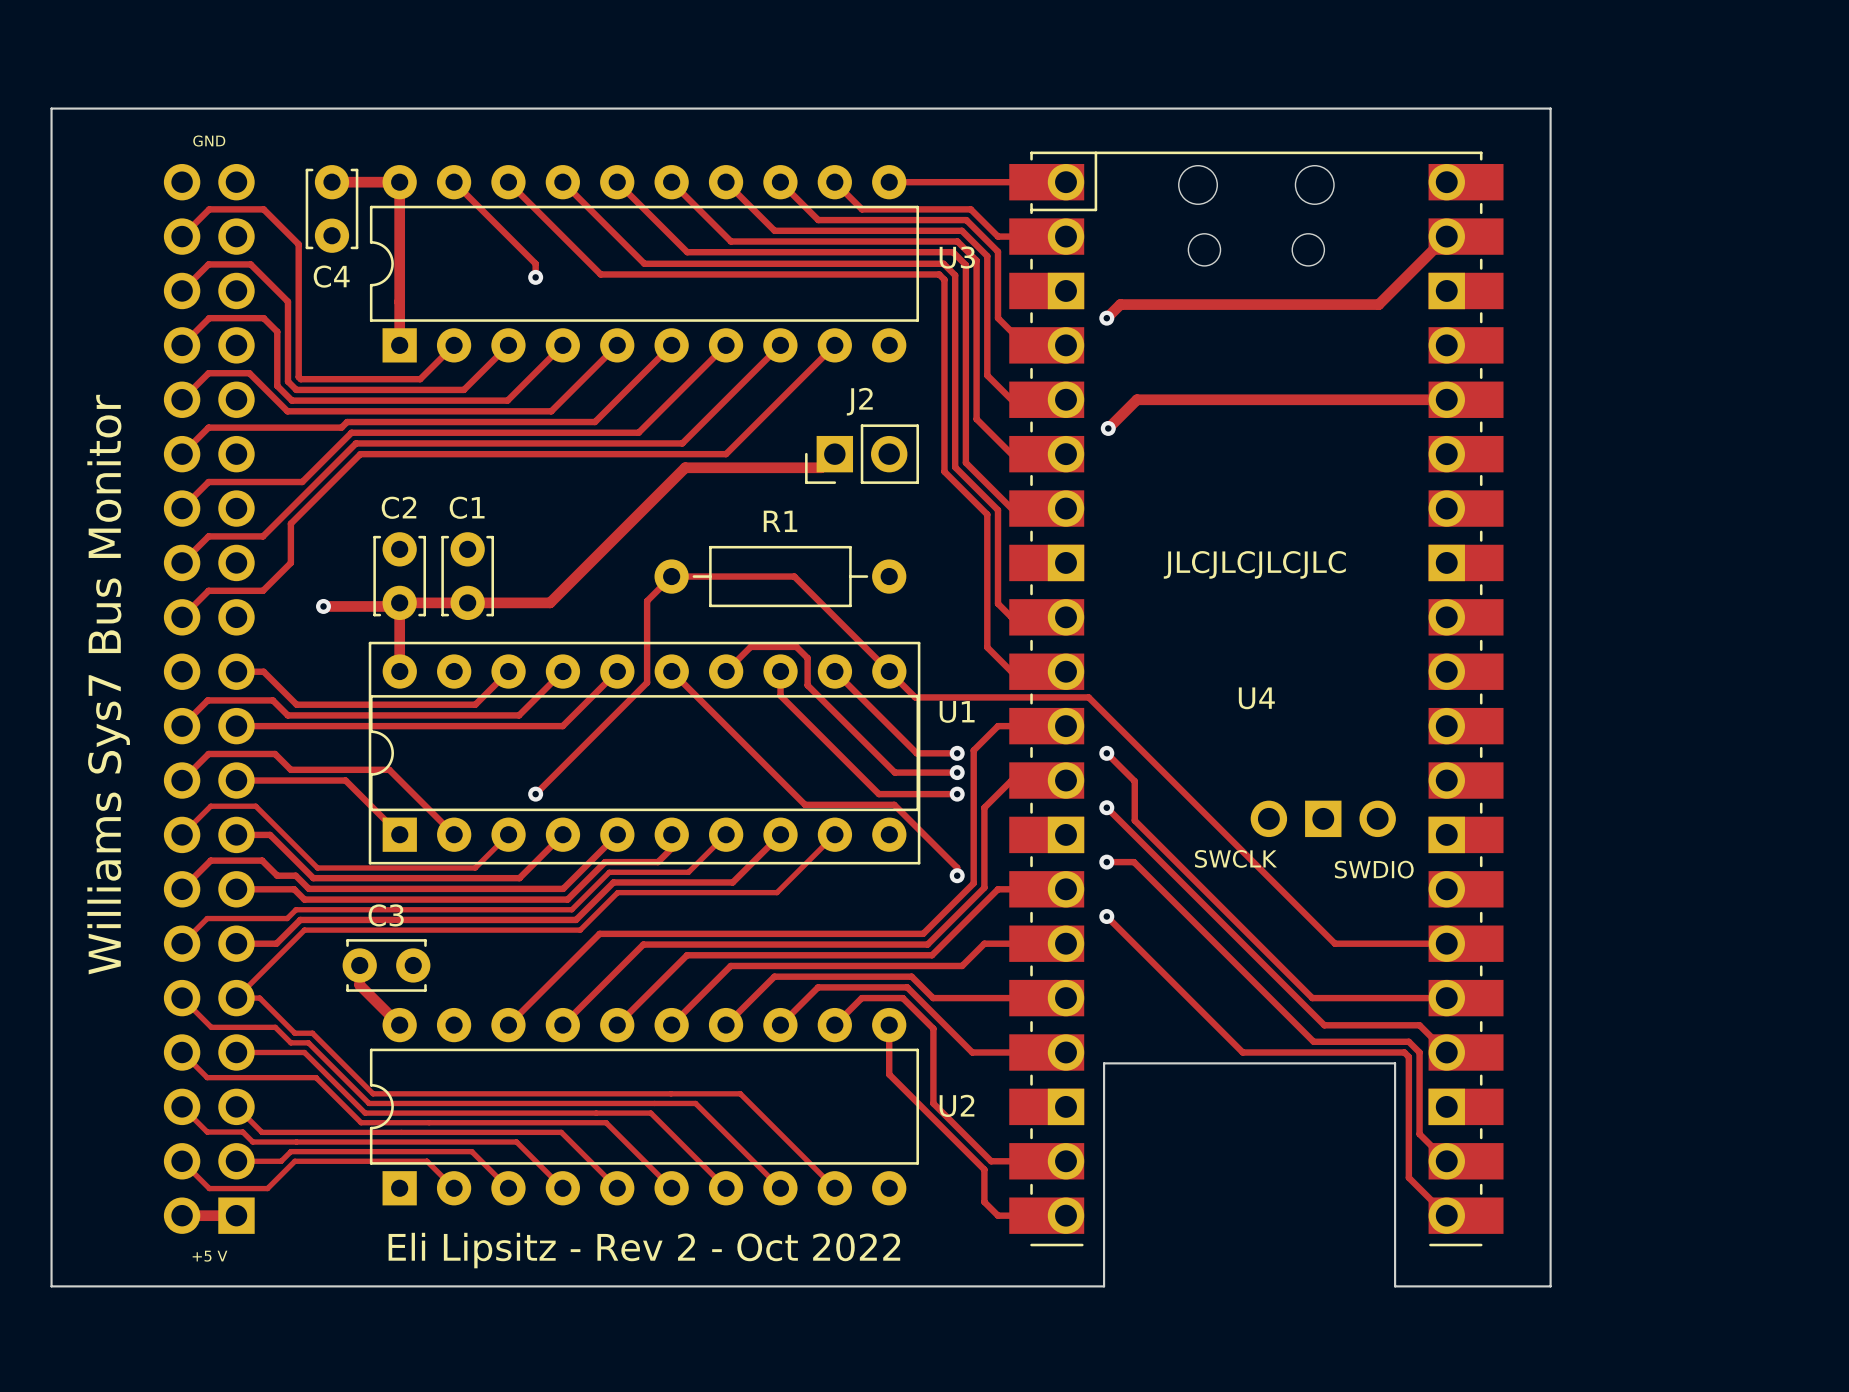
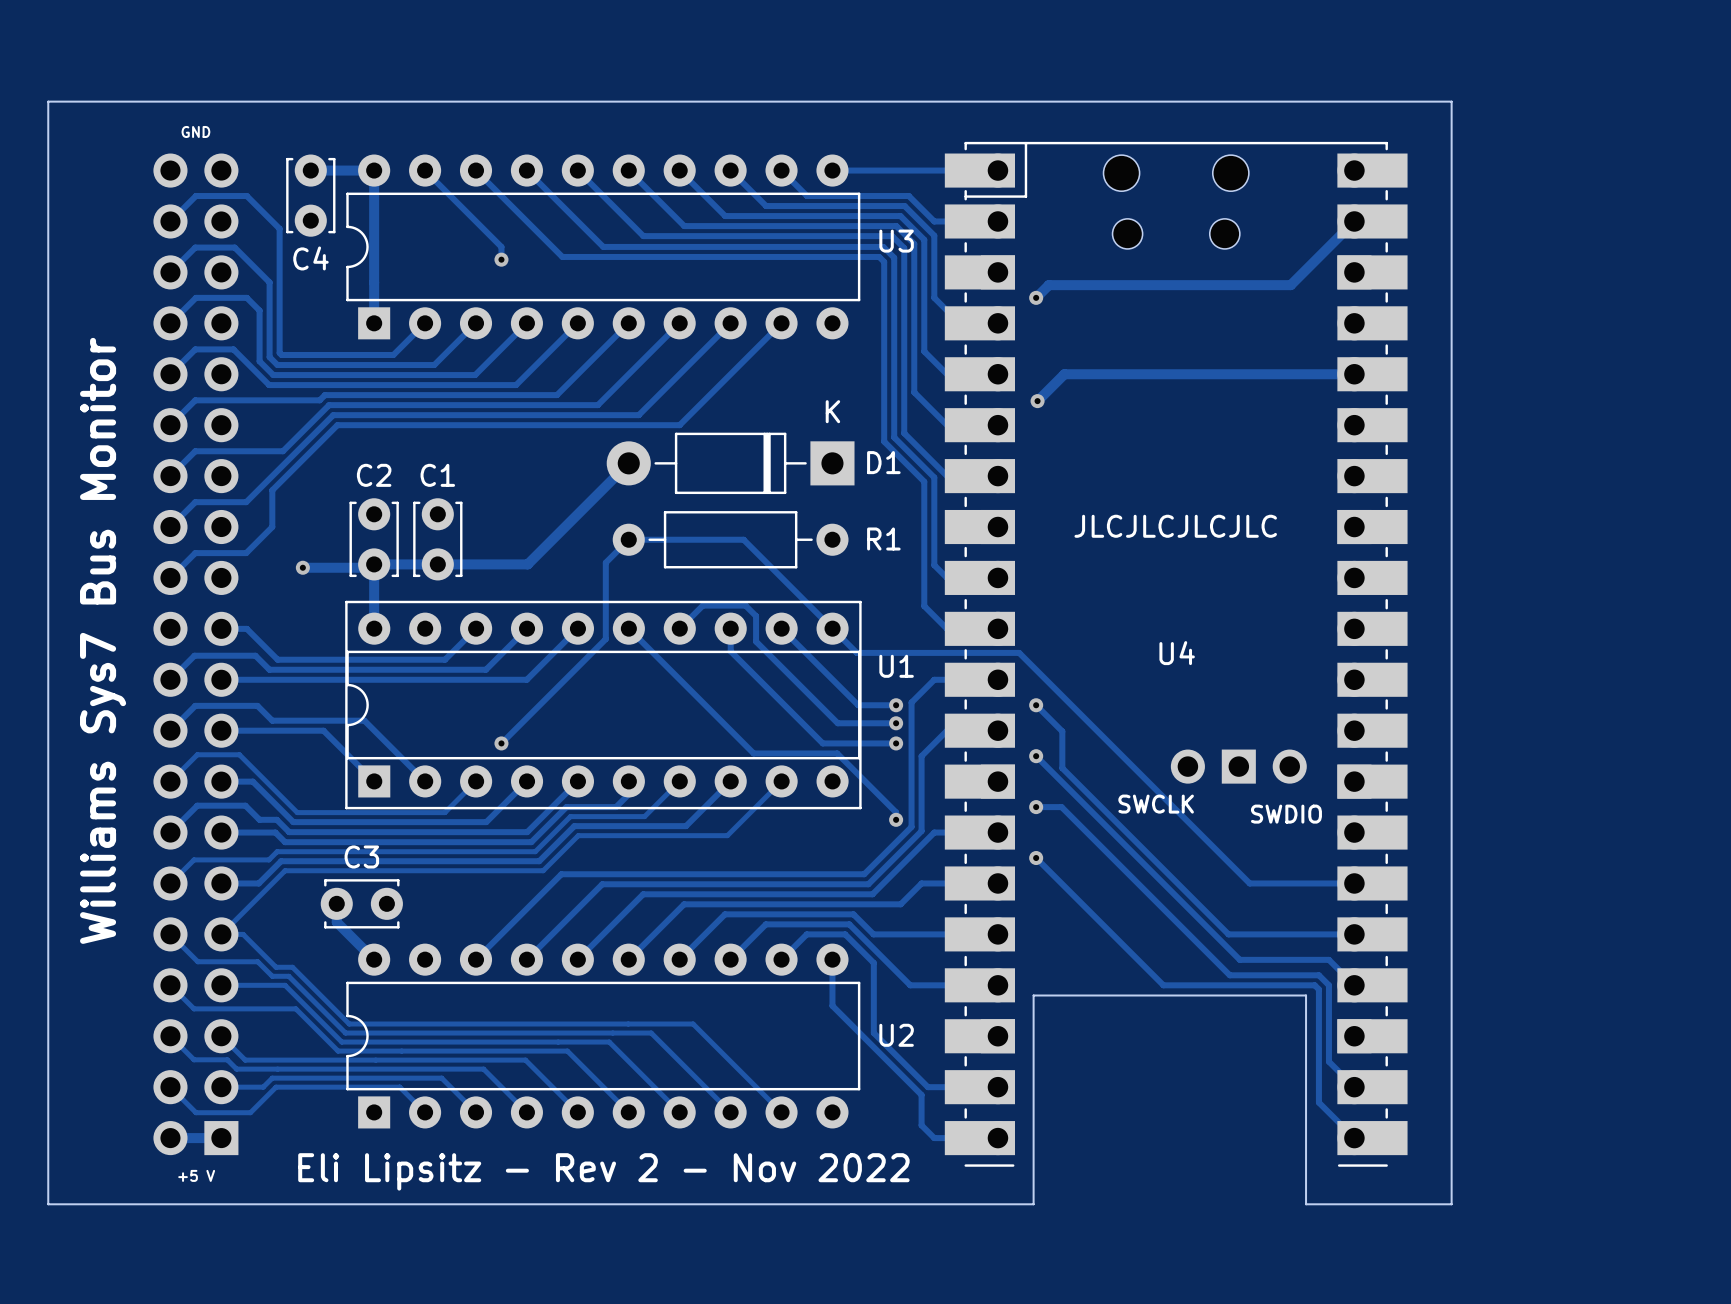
track: (834, 454) (821, 467) (685, 467) (550, 602) -> (628, 463) (527, 564) (515, 564)
J2: (862, 454) -> none
D1: none -> (730, 463)
R1 name position: R1 (780, 521) -> R1 (883, 538)
text: Eli Lipsitz - Rev 2 - Oct 2022 (644, 1250) -> Eli Lipsitz - Rev 2 - Nov 2022 (603, 1171)

